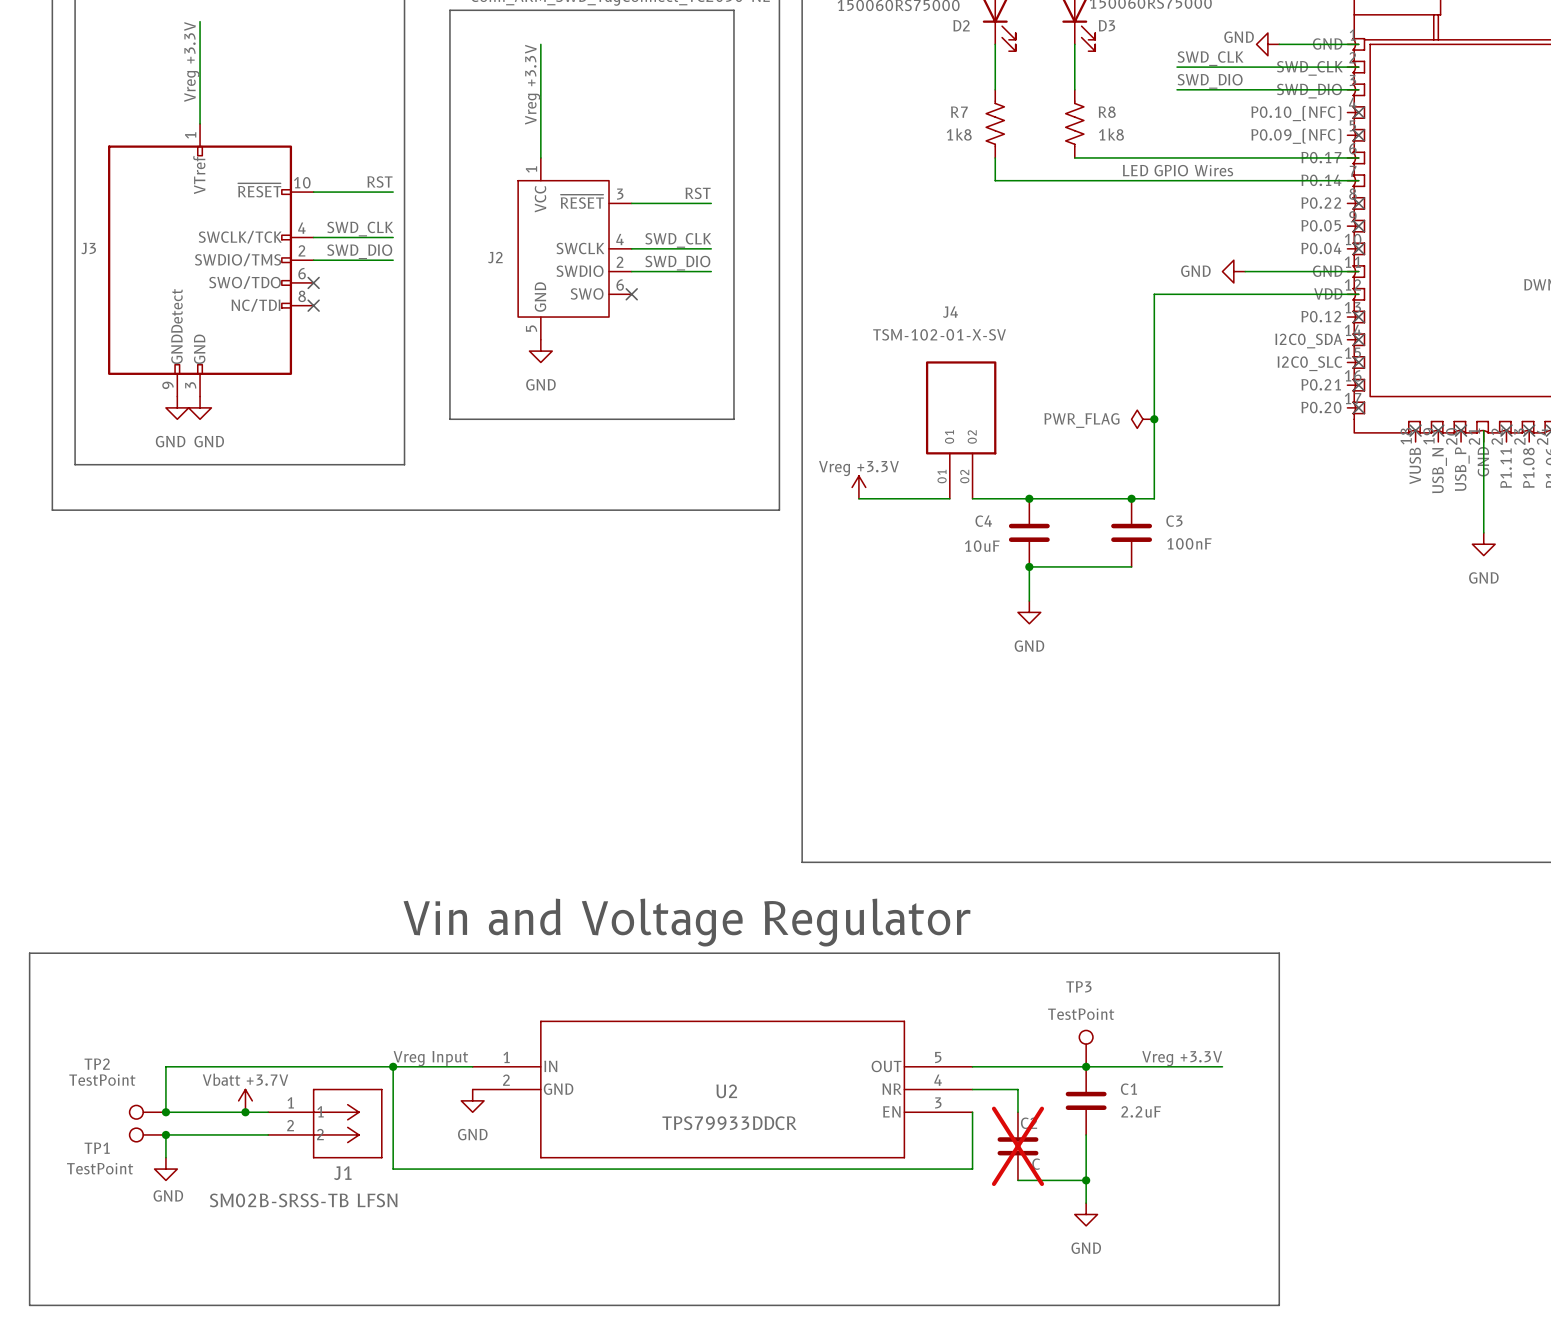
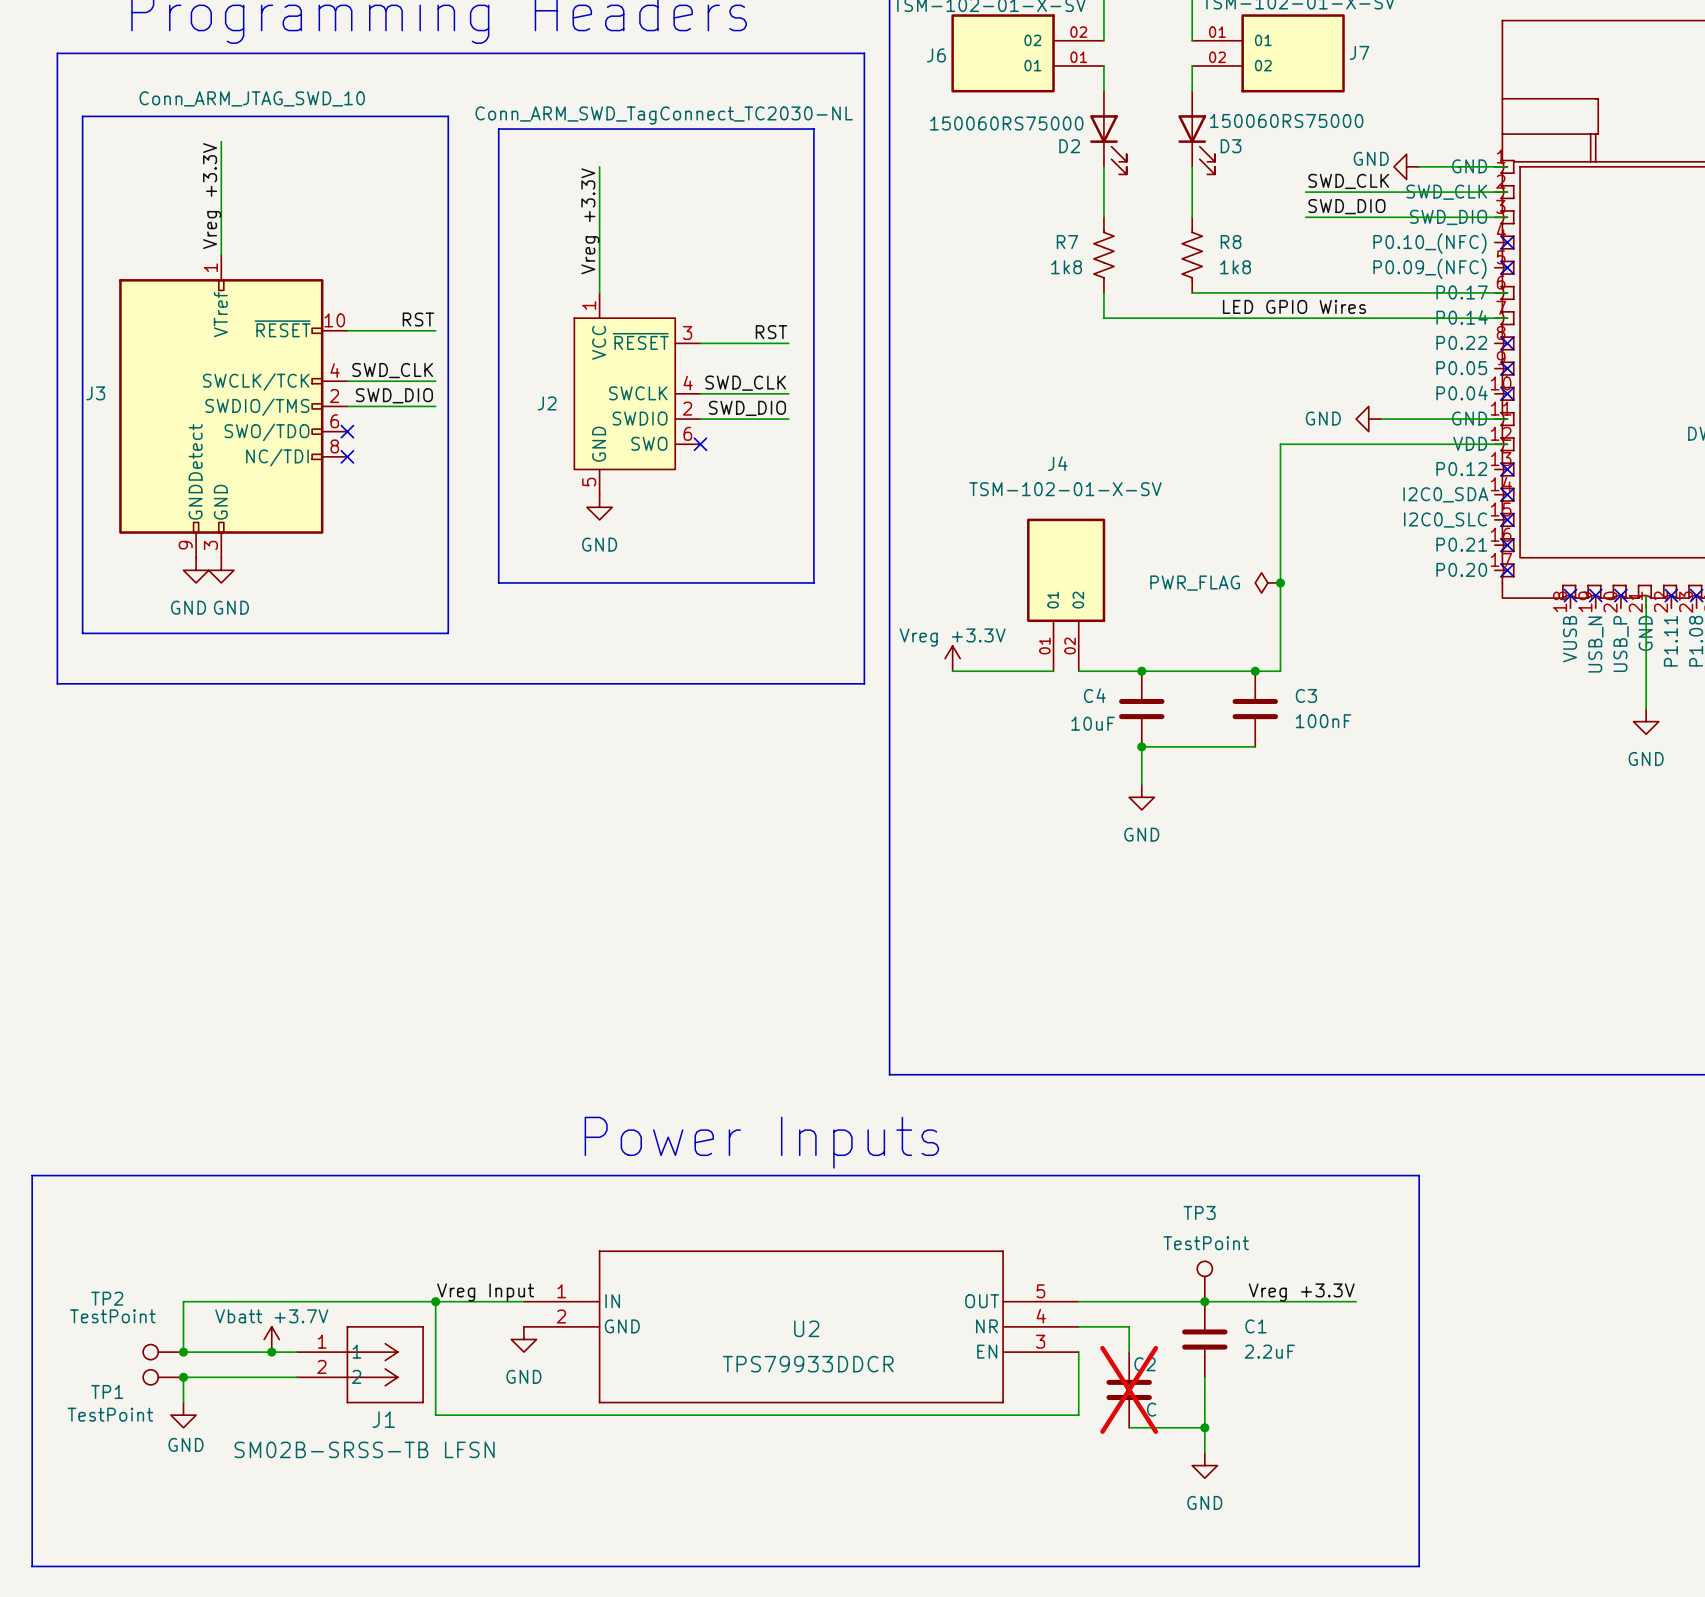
text: Vin and Voltage Regulator (687, 922) -> Power Inputs (761, 1142)

